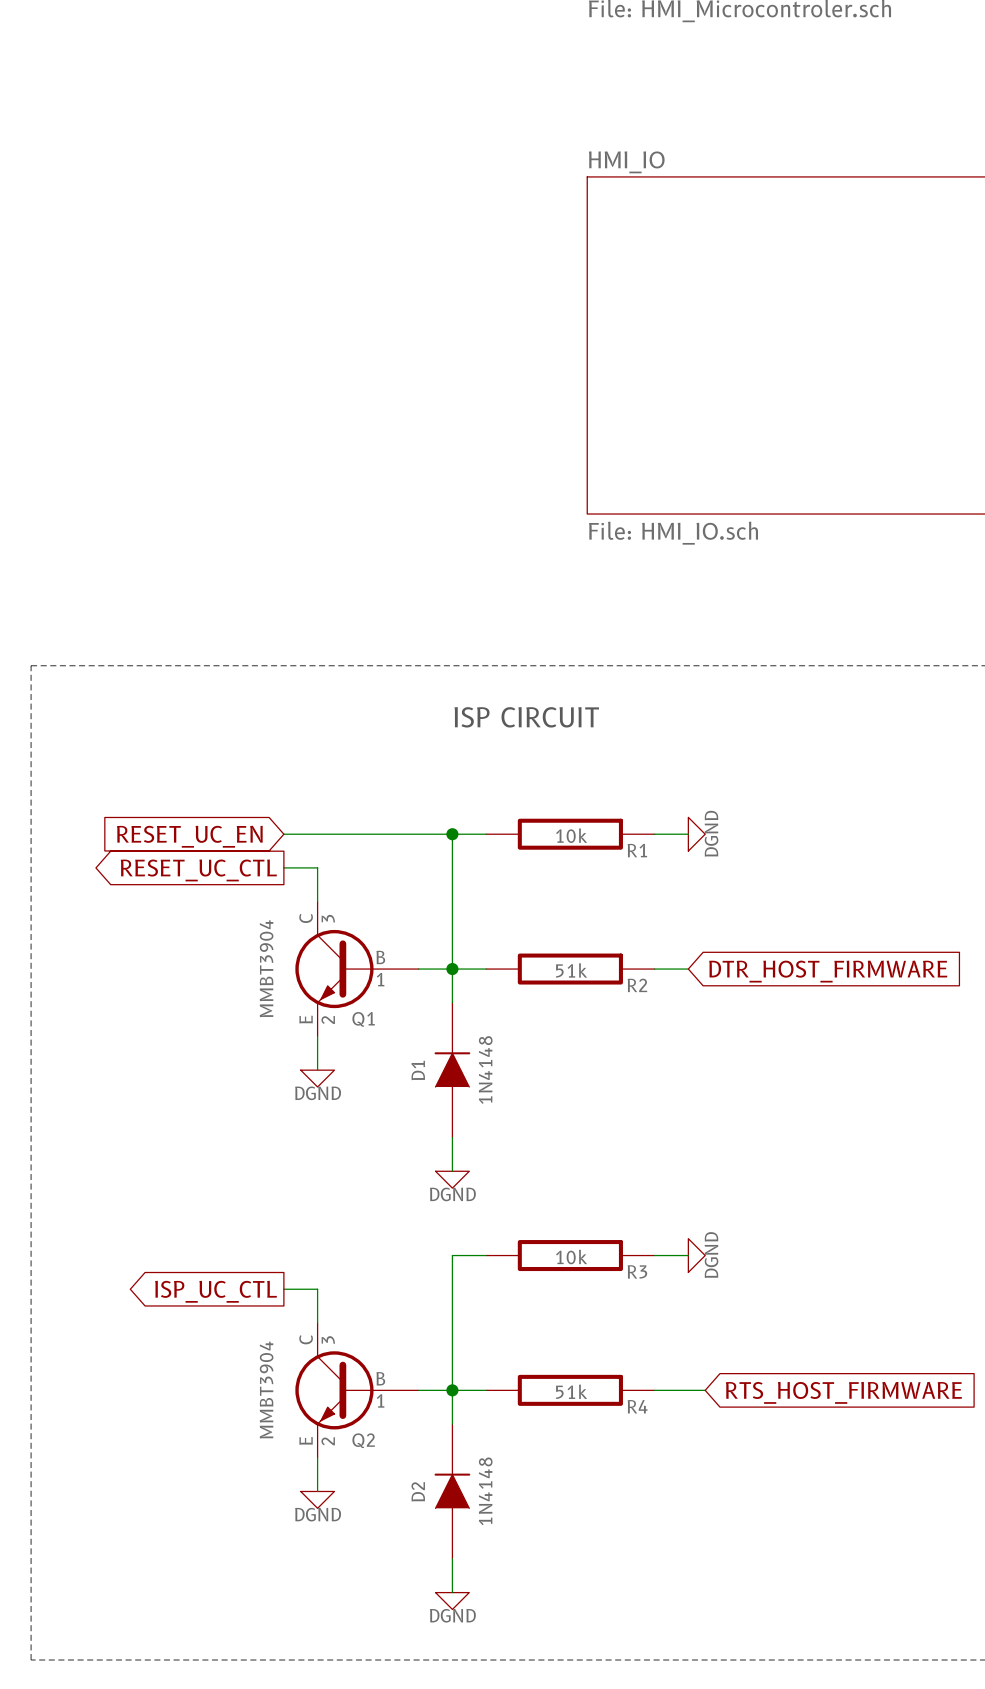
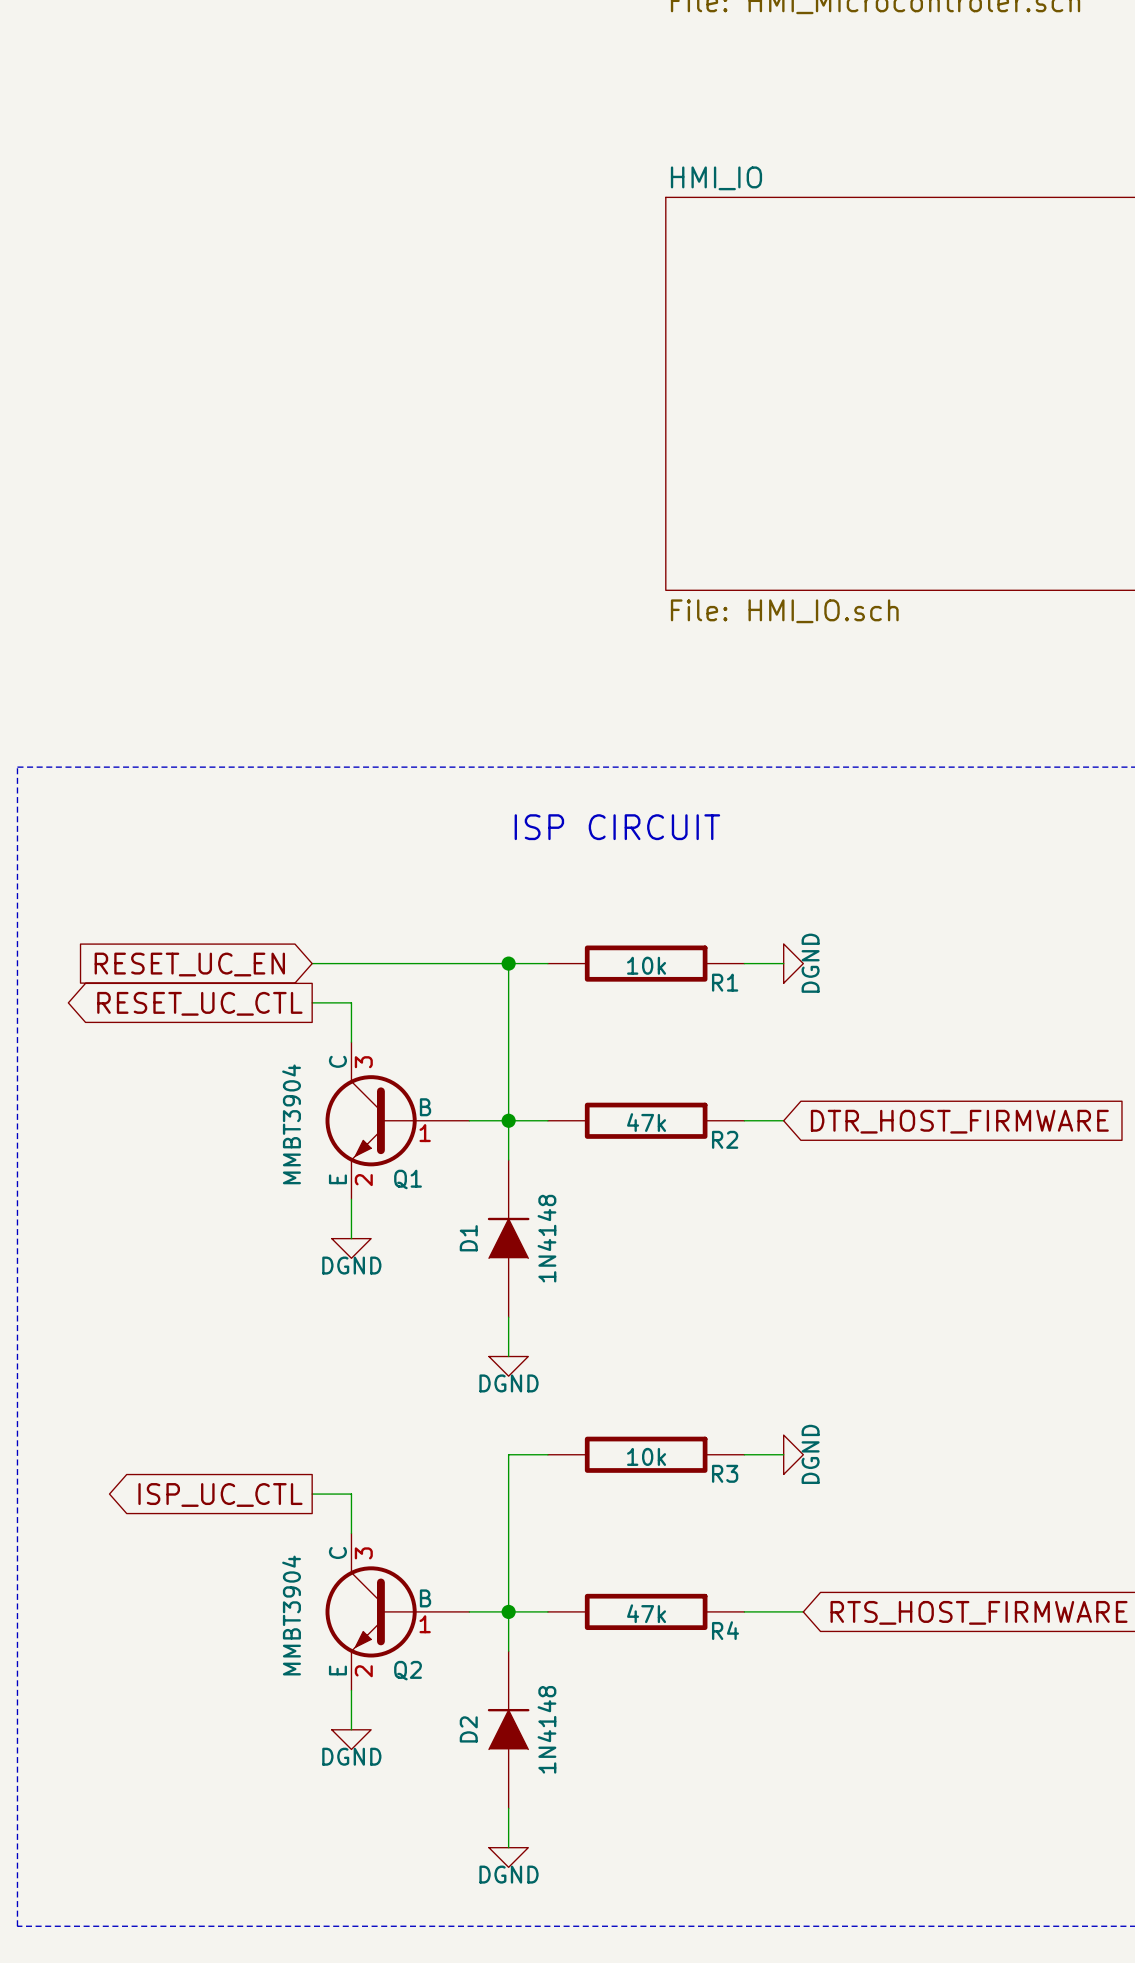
R2 value: 51k (571, 970) -> 47k (646, 1122)
R4 value: 51k (571, 1391) -> 47k (646, 1613)

